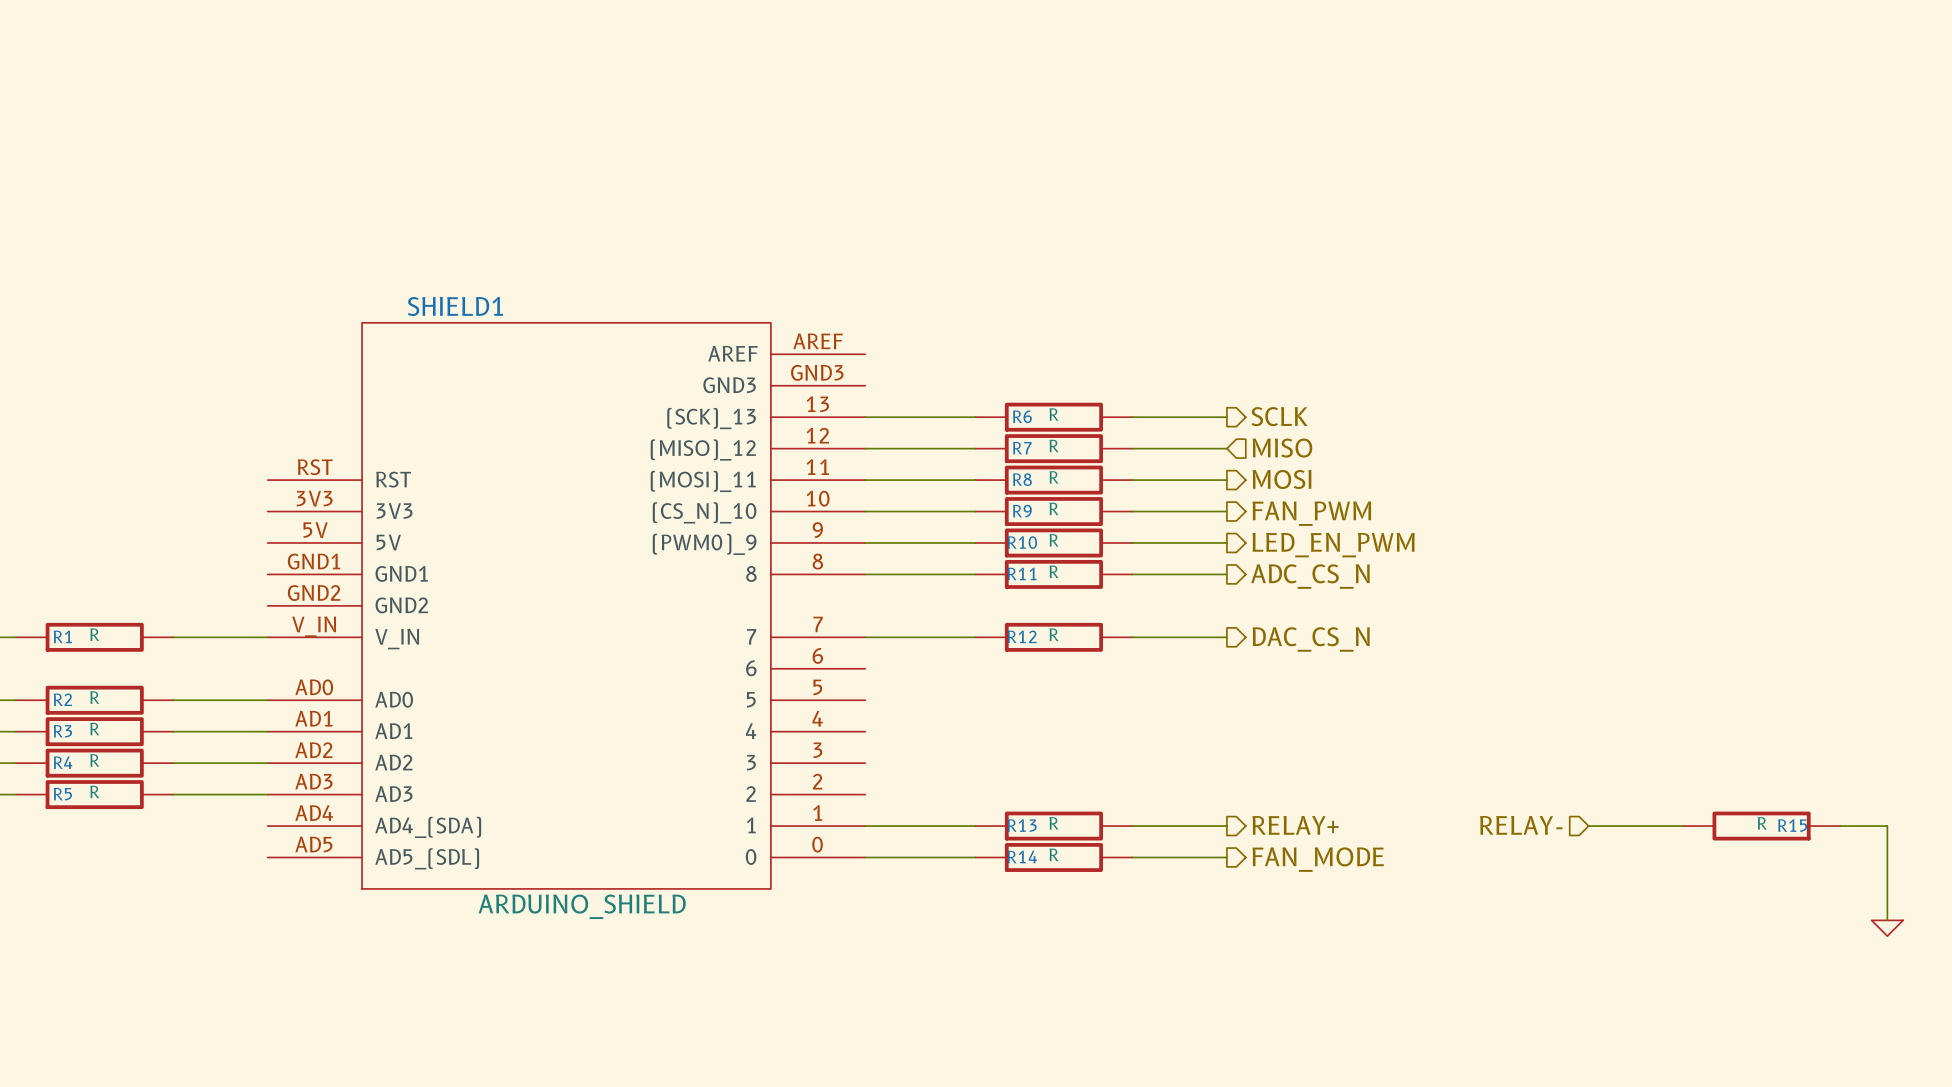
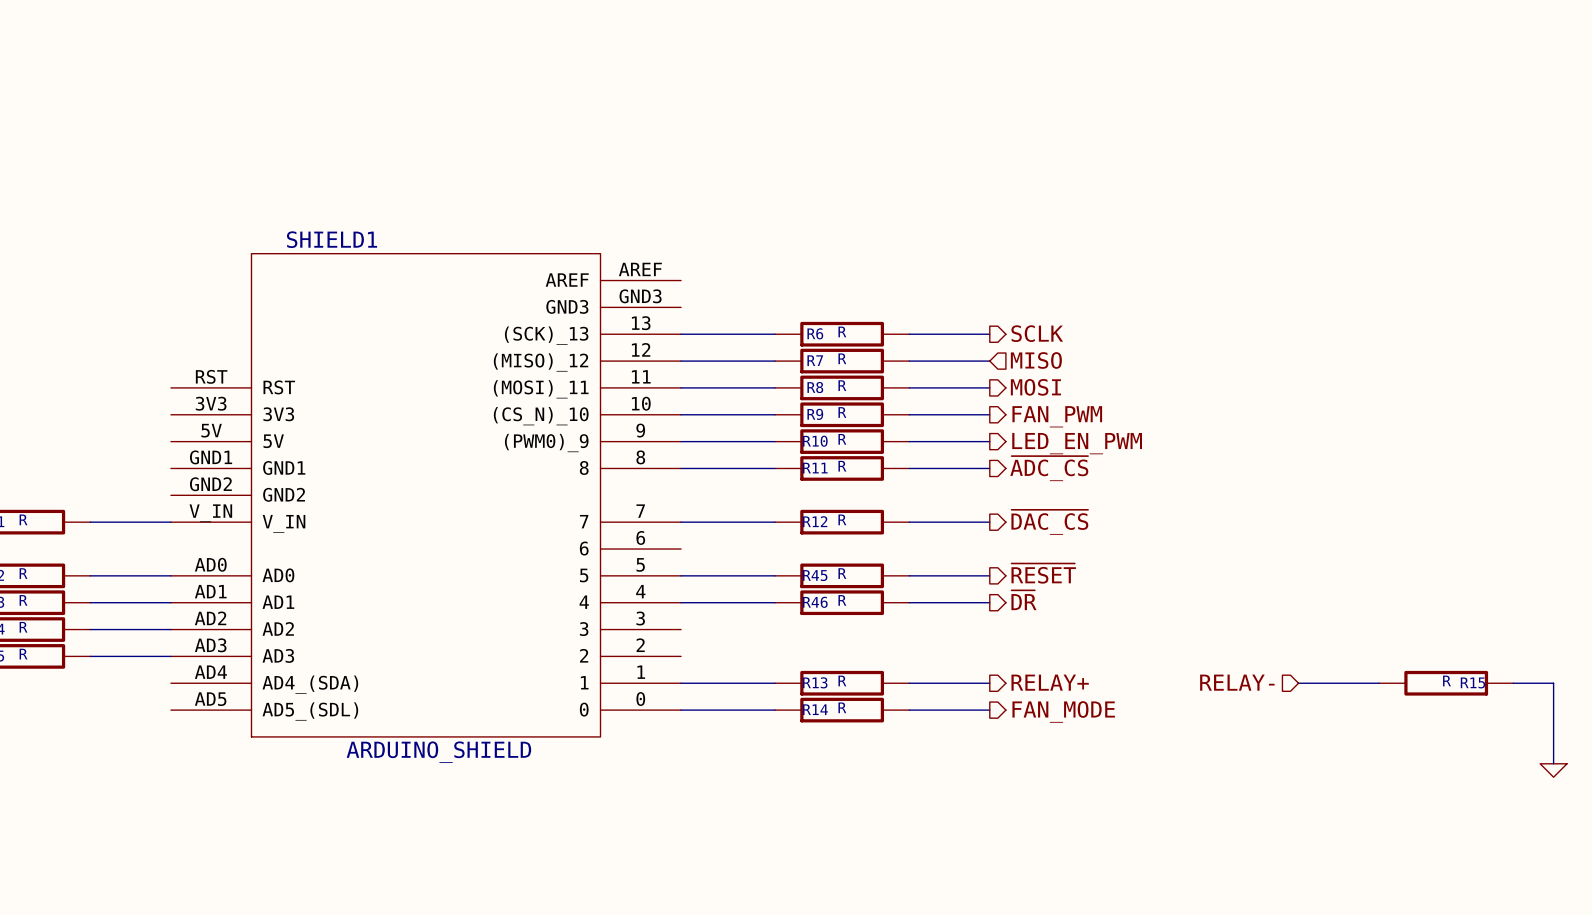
hierarchical label: ADC_CS_N (1310, 576) -> ~{ADC_CS} (1049, 468)
hierarchical label: DAC_CS_N (1311, 639) -> ~{DAC_CS} (1049, 522)
hierarchical label: none -> ~{RESET} (1043, 573)
wire: none -> (681, 575) (775, 575)
R45: none -> R (842, 575)
wire: none -> (909, 575) (989, 575)
hierarchical label: none -> ~{DR} (1023, 600)
wire: none -> (681, 602) (775, 602)
R46: none -> R (842, 602)
wire: none -> (909, 602) (989, 602)

